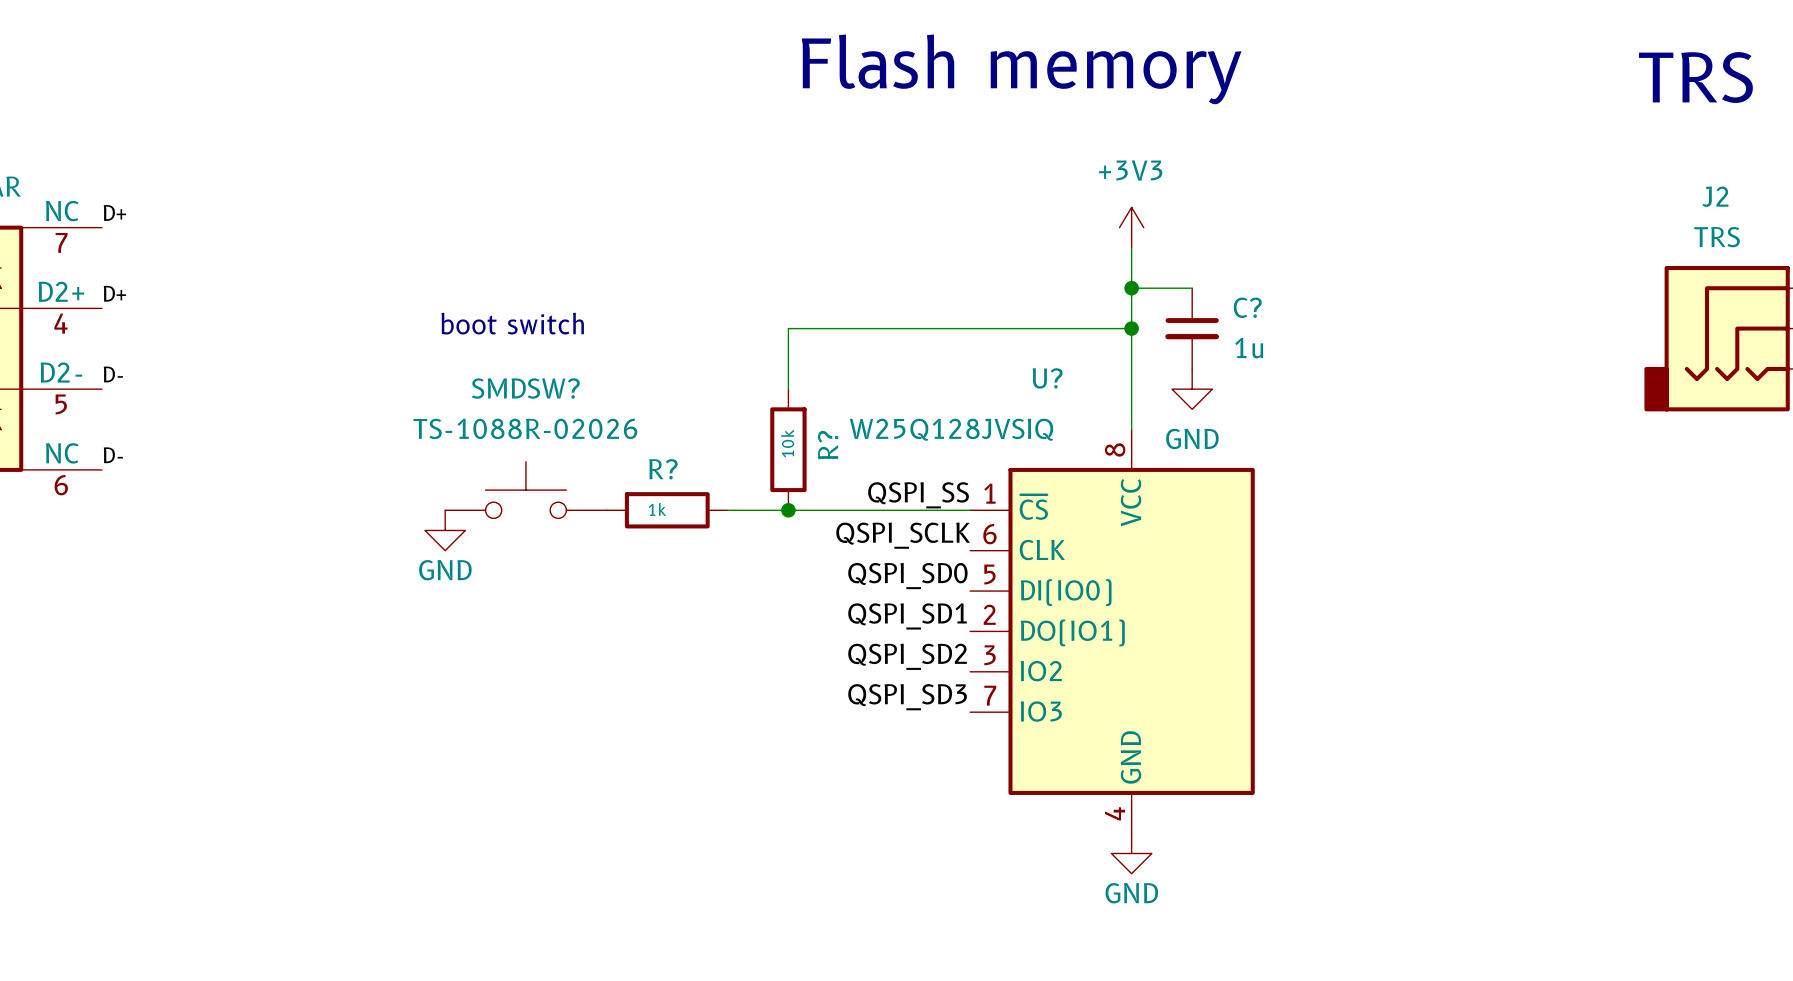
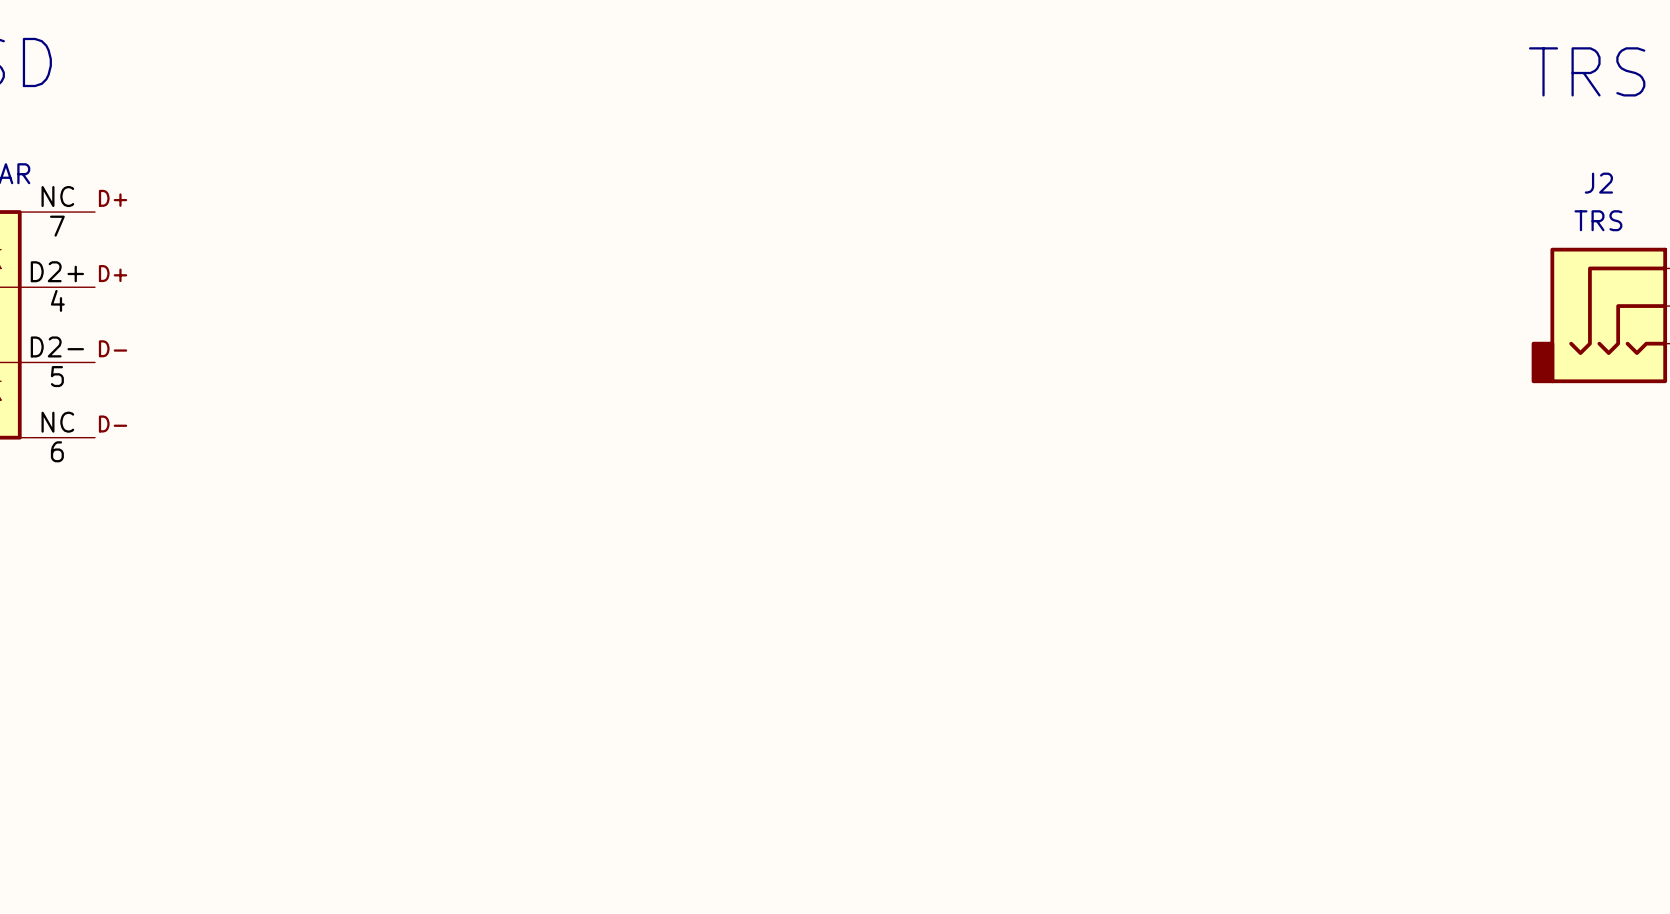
text: Flash memory (1021, 69) -> none
power symbol: +3V3 (1131, 227) -> none
wire: (1131, 247) (1131, 429) -> none
wire: (1131, 288) (1192, 288) -> none
junction: (1131, 288) -> none
text: boot switch (512, 323) -> none
wire: (1131, 328) (788, 328) (788, 389) -> none
junction: (1131, 328) -> none
C?: 1u (1192, 328) -> none
power symbol: GND (1192, 389) -> none
R?: 10k (788, 449) -> none
SMDSW?: TS-1088R-02026 (525, 490) -> none
label: QSPI_SS (918, 495) -> none
R?: 1k (667, 510) -> none
wire: (727, 510) (970, 510) -> none
junction: (788, 510) -> none
power symbol: GND (445, 530) -> none
label: QSPI_SCLK (903, 535) -> none
label: QSPI_SD0 (907, 576) -> none
label: QSPI_SD1 (907, 616) -> none
U?: W25Q128JVSIQ (1112, 631) -> none
label: QSPI_SD2 (907, 656) -> none
label: QSPI_SD3 (907, 697) -> none
power symbol: GND (1131, 853) -> none

